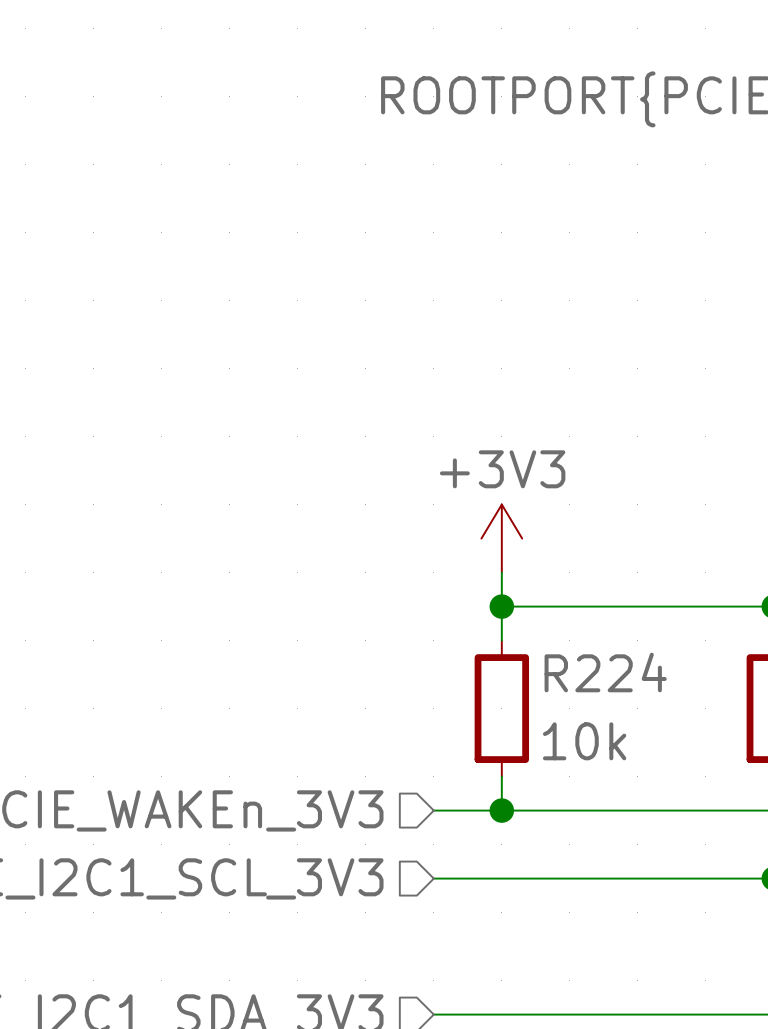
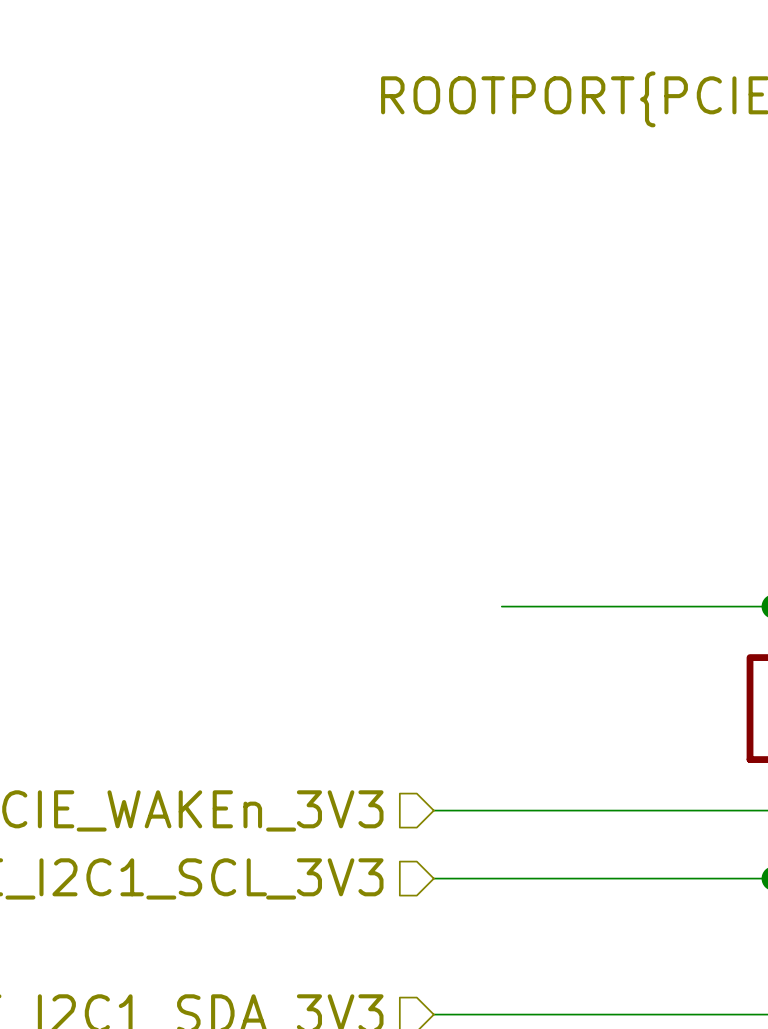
power symbol: +3V3 (501, 538) -> none
wire: (501, 572) (501, 640) -> none
junction: (501, 606) -> none
R224: (501, 708) -> none
wire: (501, 776) (501, 810) -> none
junction: (501, 810) -> none

